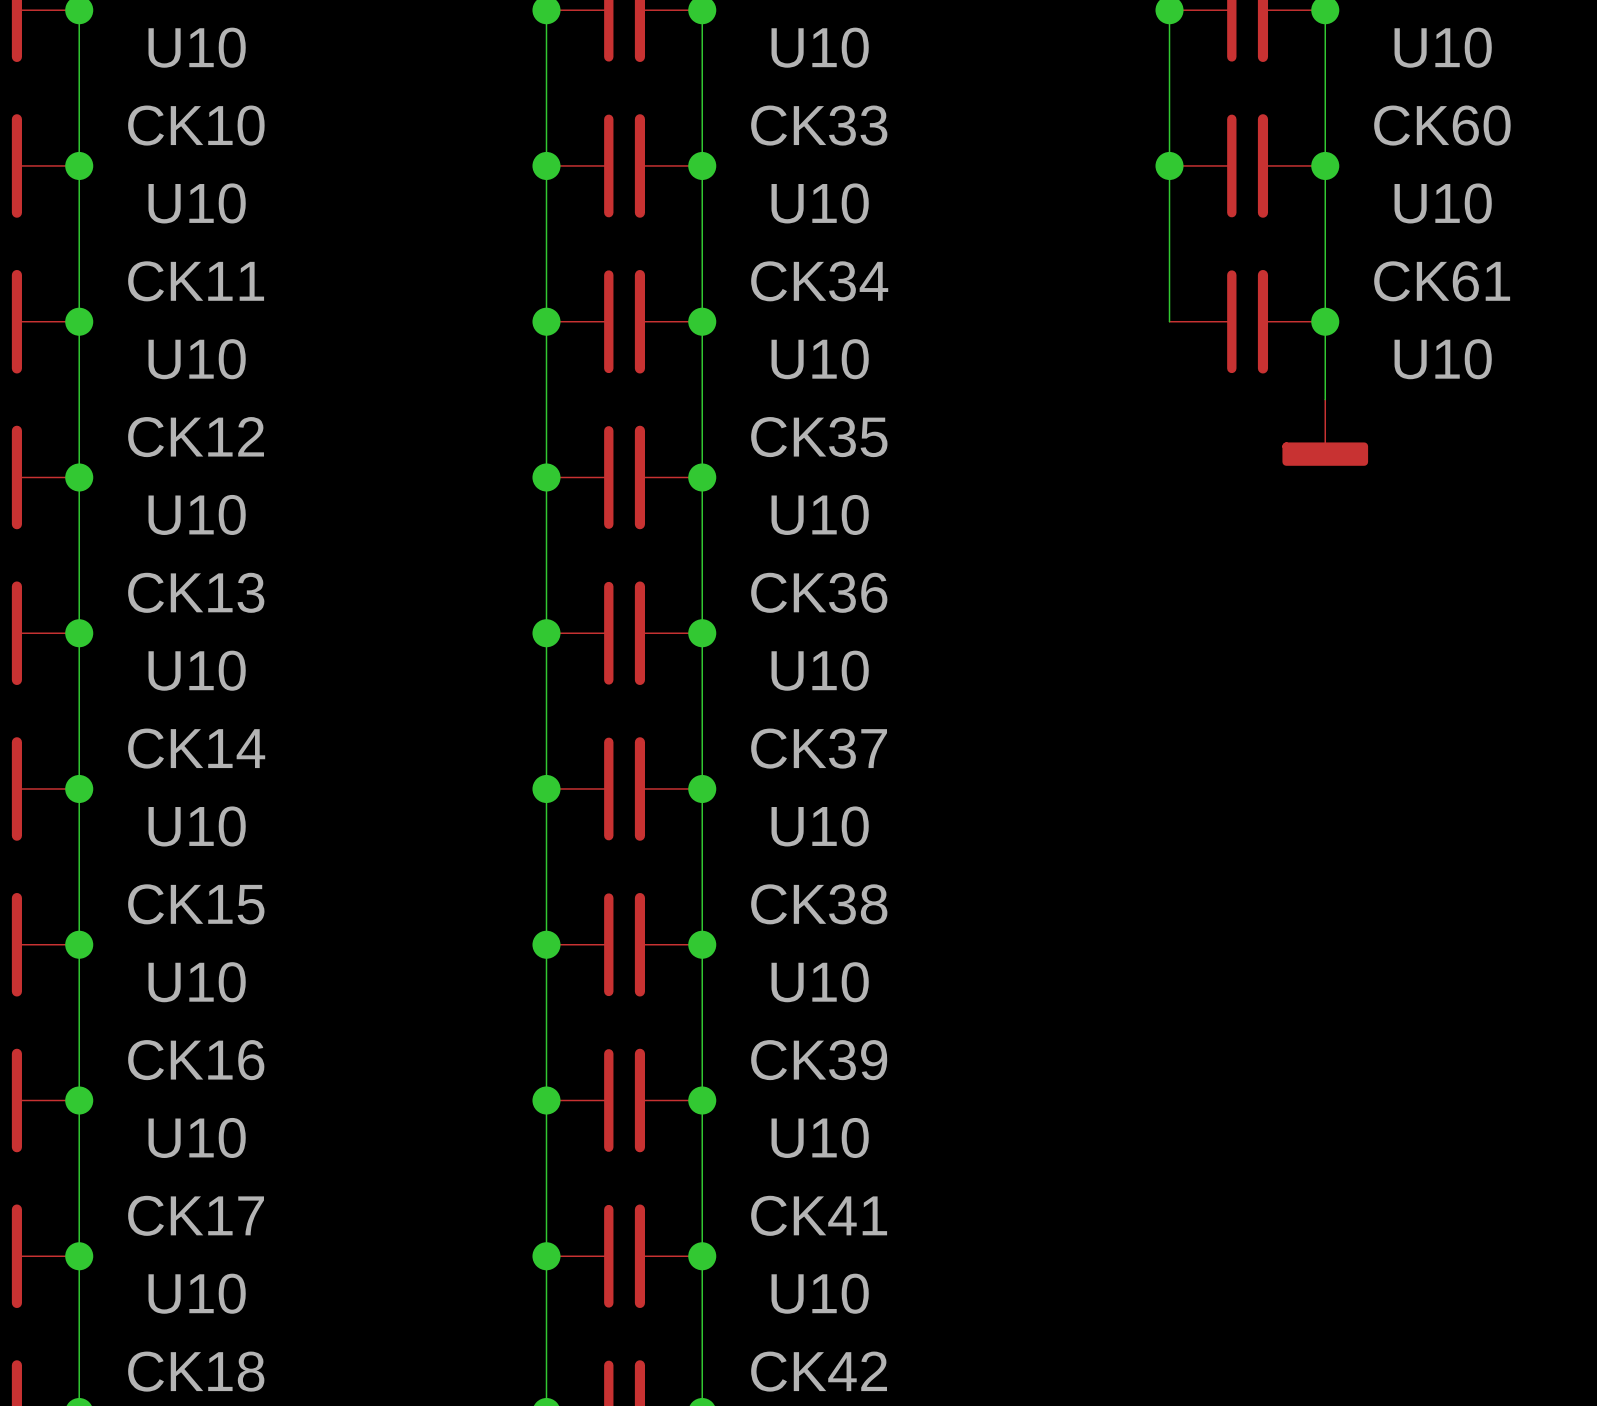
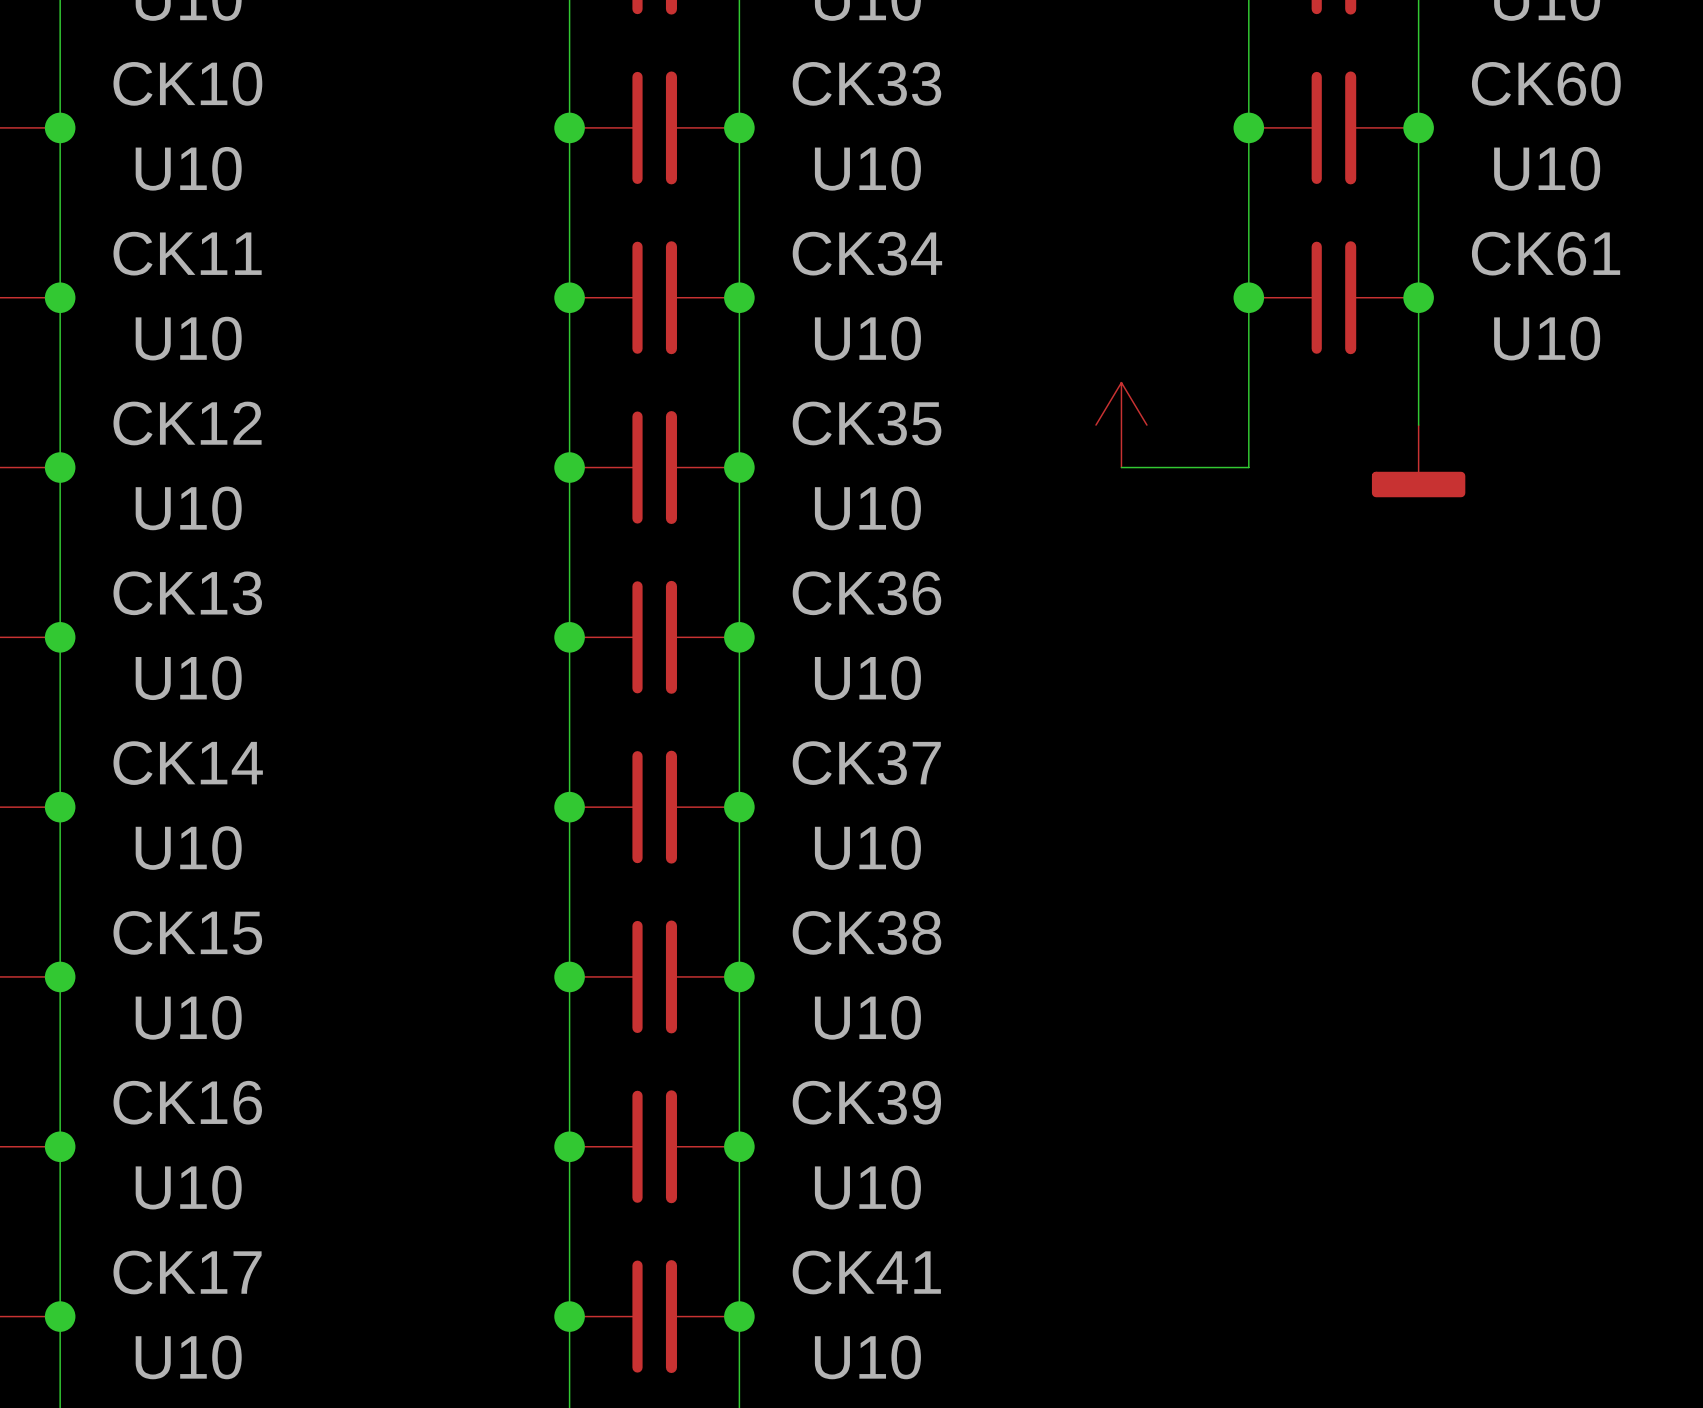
wire: none -> (1248, 297) (1248, 467) (1121, 467)
junction: none -> (1248, 297)
power symbol position: (1325, 432) -> (1418, 461)
power symbol: none -> (1121, 425)

